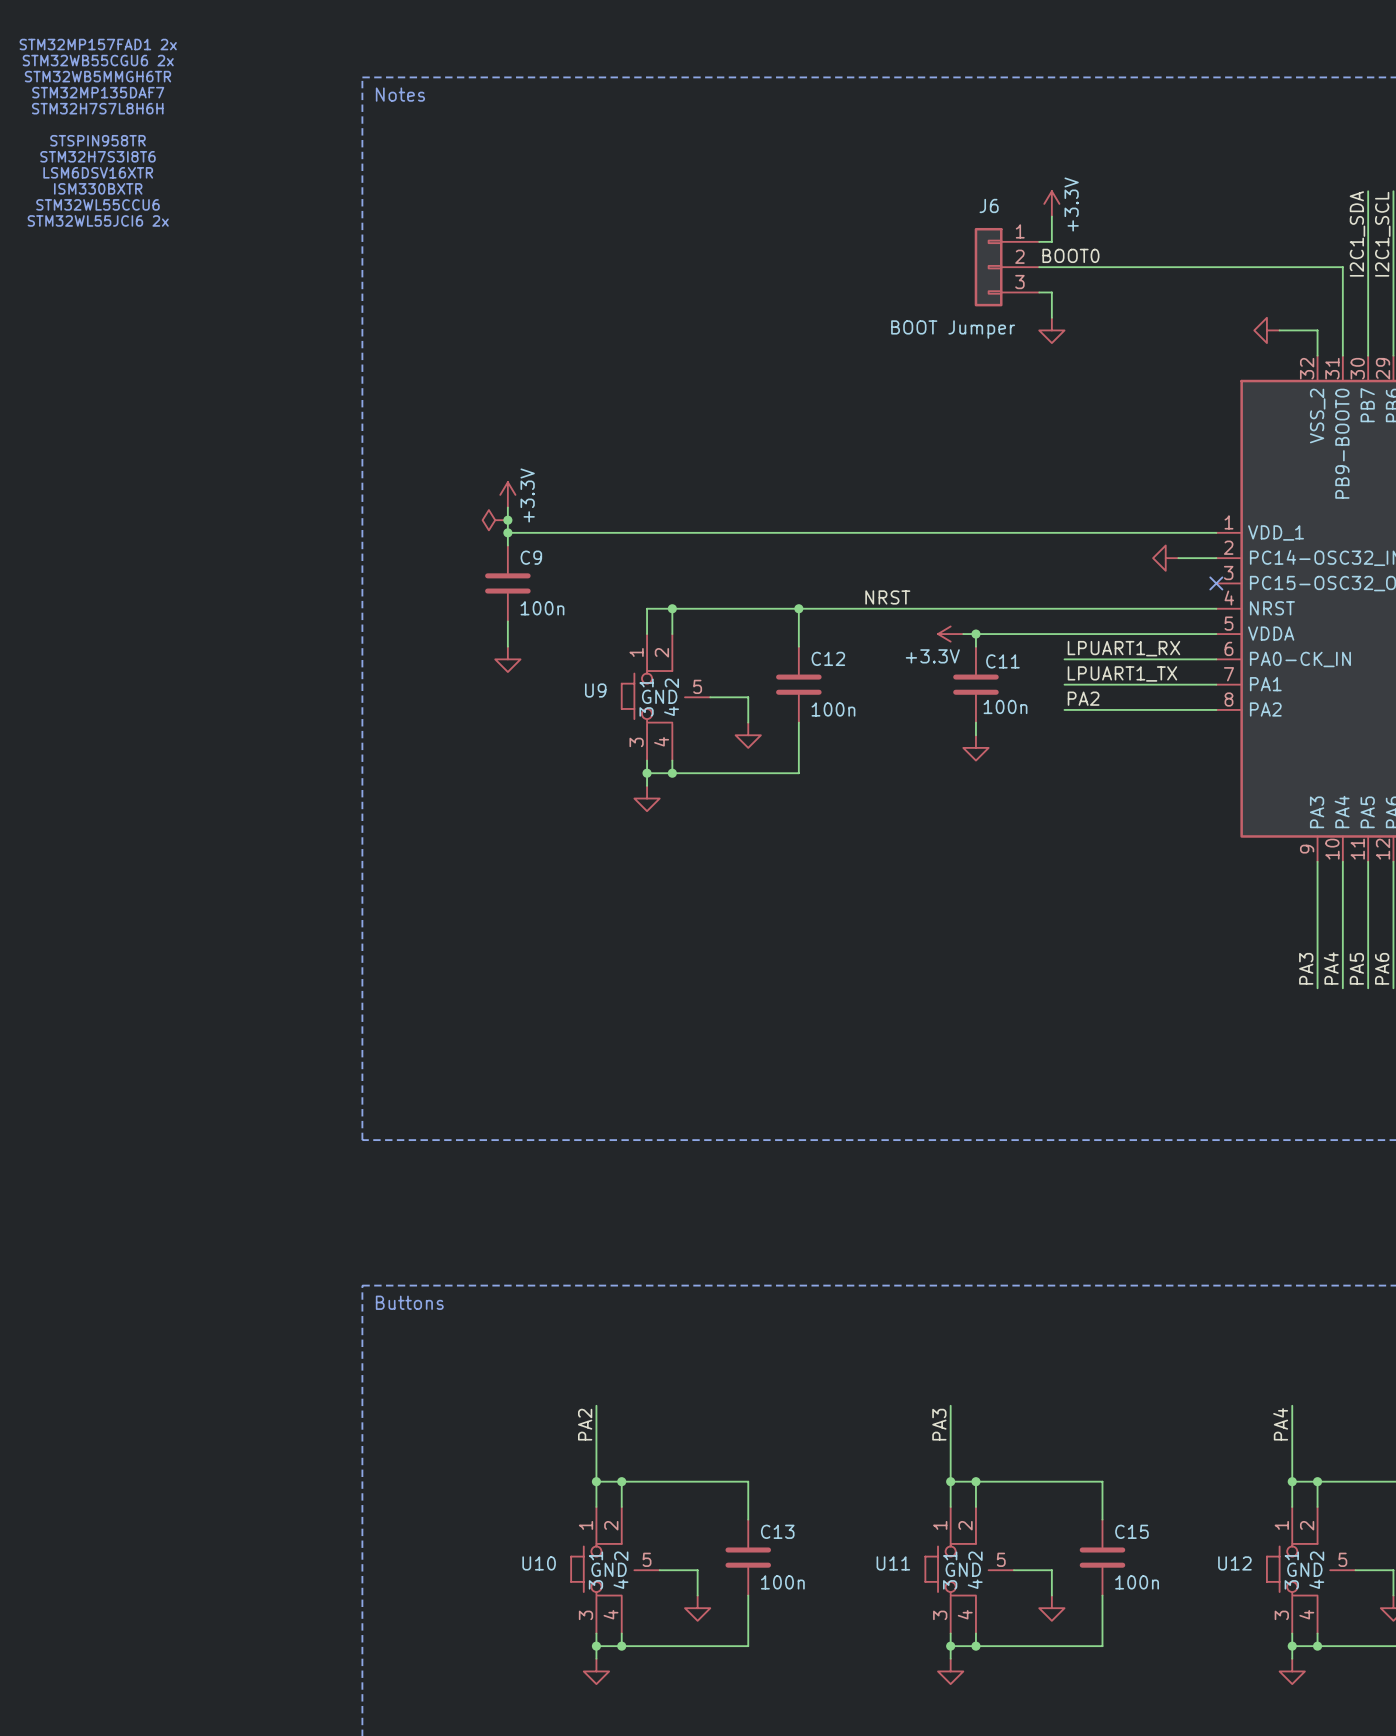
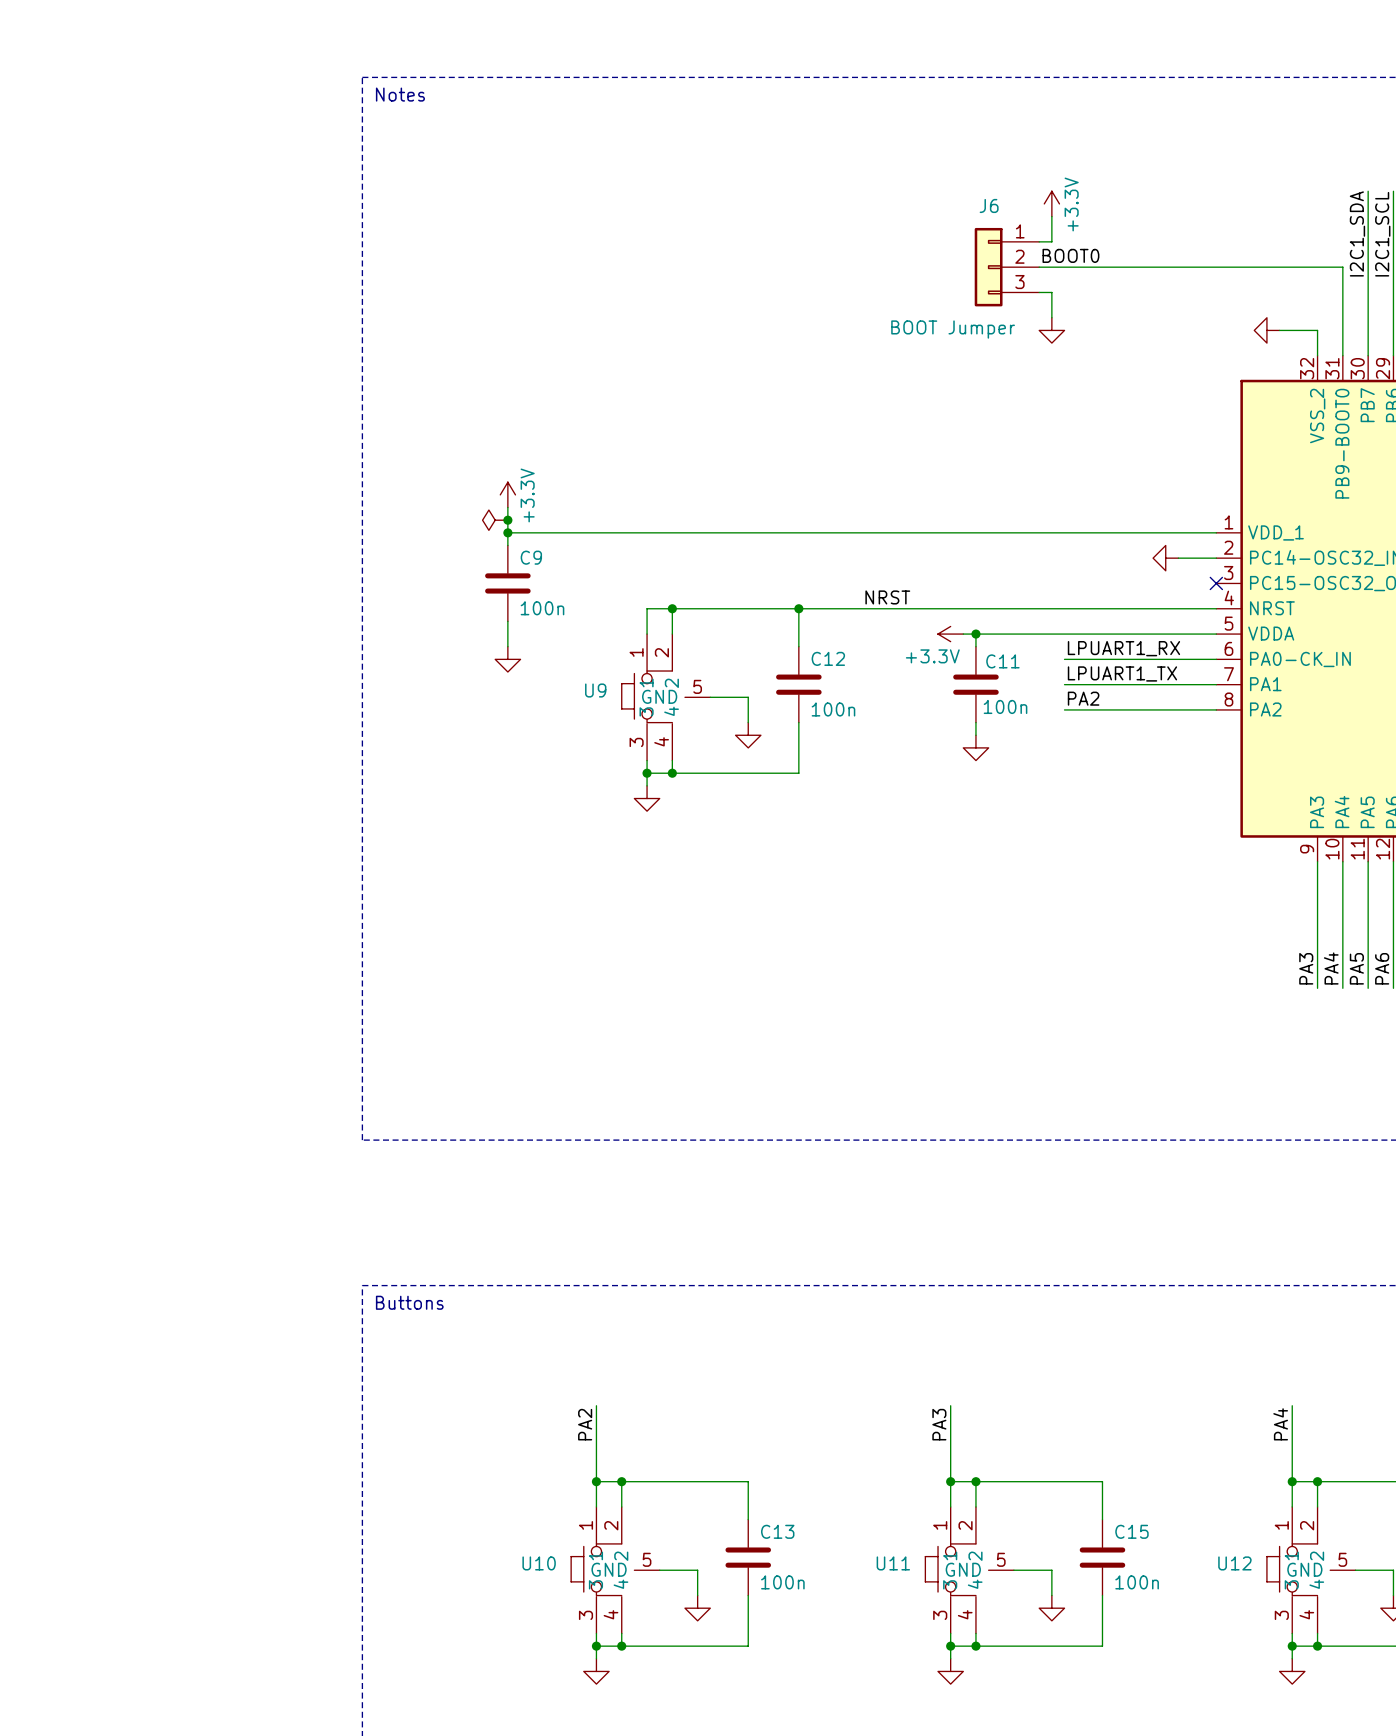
text: STM32MP157FAD1 2x (98, 44) -> none
text: STM32WB55CGU6 2x (98, 60) -> none
text: STM32WB5MMGH6TR (97, 76) -> none
text: STM32MP135DAF7 (98, 92) -> none
text: STM32H7S7L8H6H (97, 108) -> none
text: STSPIN958TR (97, 140) -> none
text: STM32H7S3I8T6 (97, 156) -> none
text: LSM6DSV16XTR (98, 172) -> none
text: ISM330BXTR (98, 188) -> none
text: STM32WL55CCU6 (97, 204) -> none
text: STM32WL55JCI6 2x (98, 220) -> none

